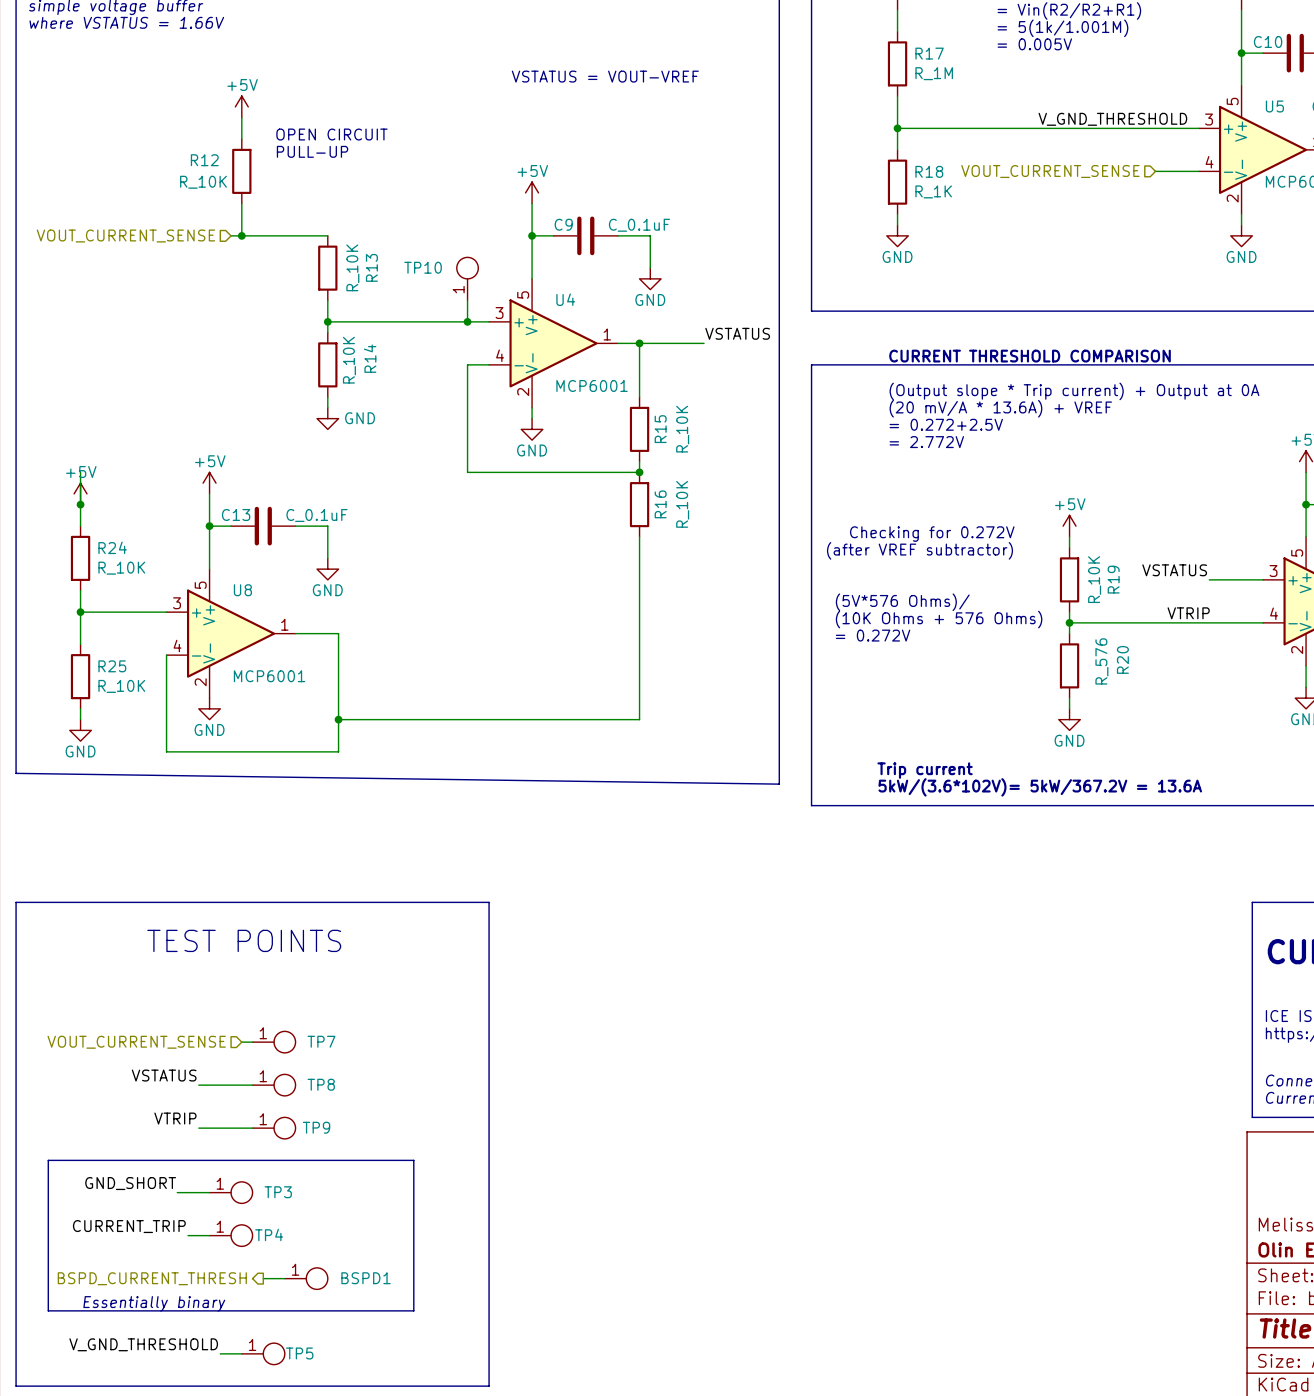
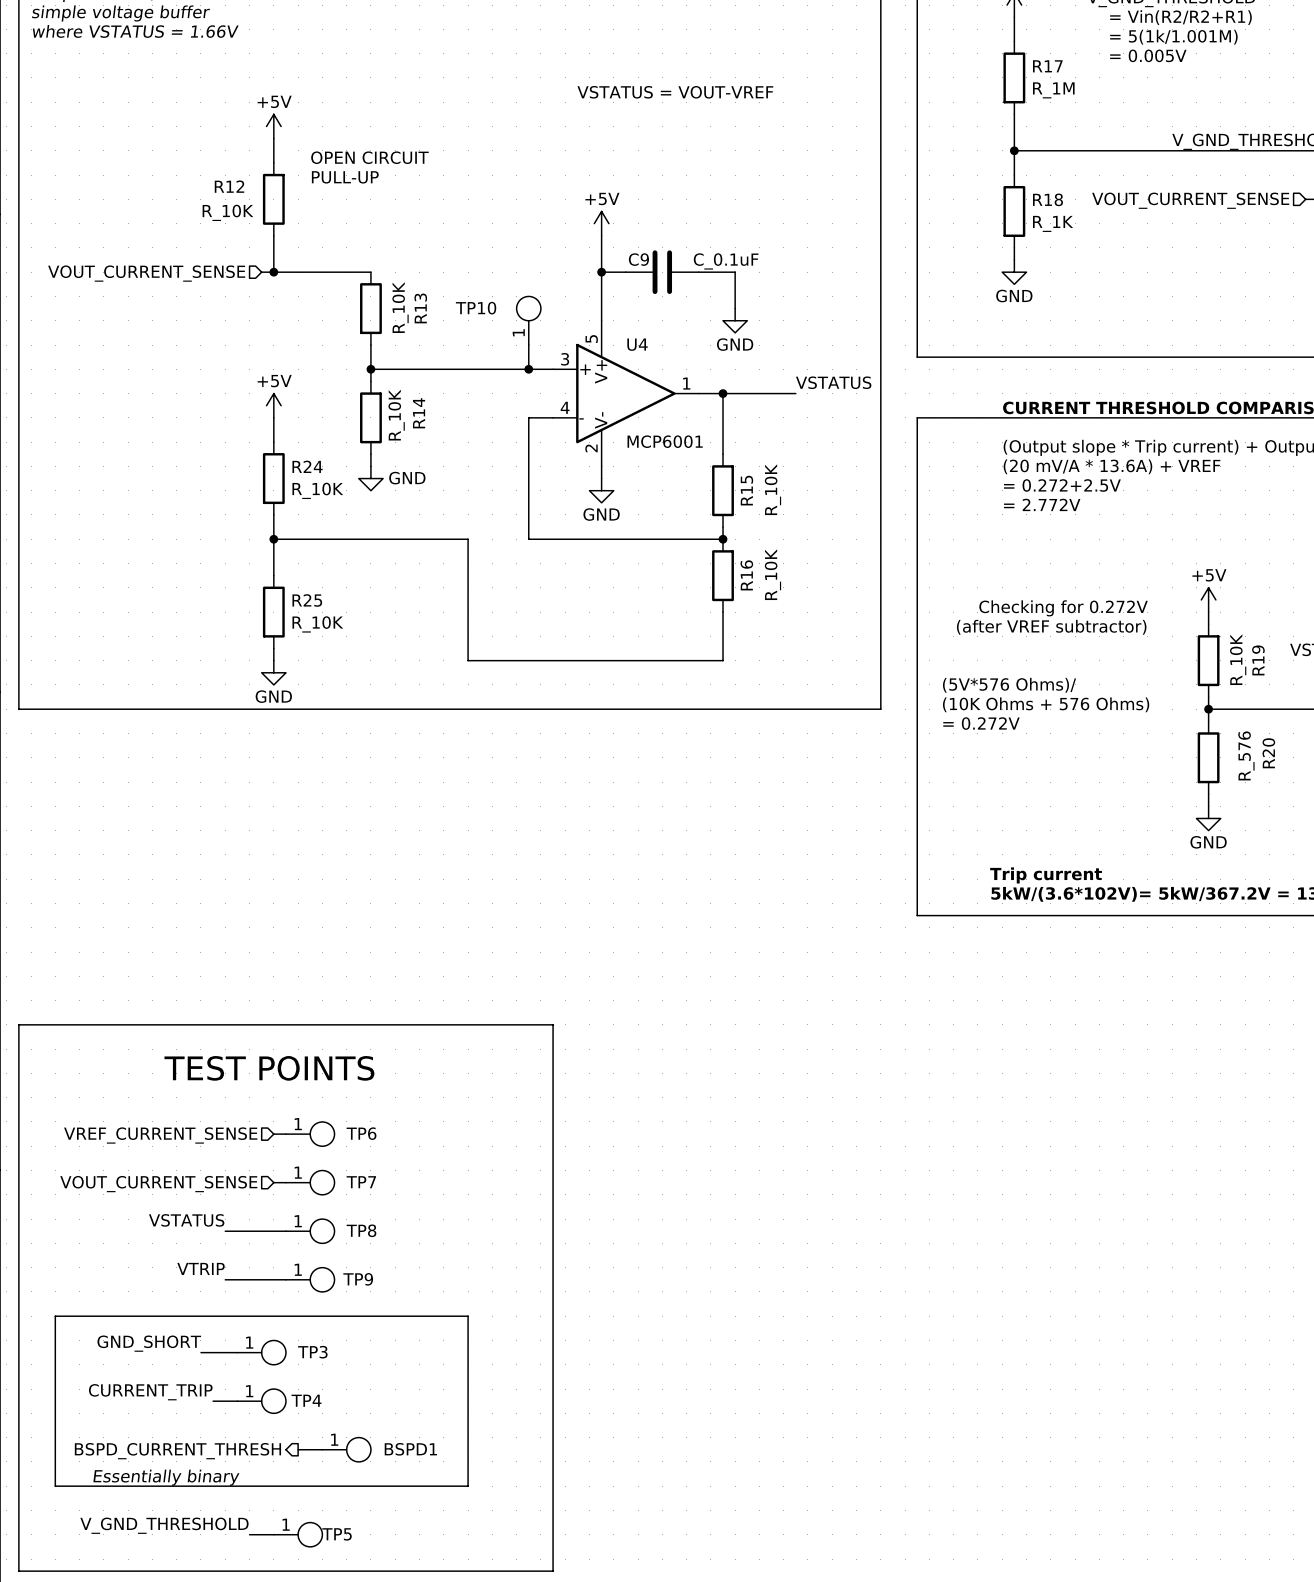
power symbol: none -> +5V (273, 405)
wire: none -> (273, 417) (273, 442)
wire: (80, 472) (80, 526) -> (273, 514) (273, 575)
junction: none -> (273, 539)
power symbol: +5V (209, 483) -> none
power symbol: +5V (80, 493) -> none
wire: (209, 493) (209, 569) -> none
junction: (80, 504) -> none
wire: (209, 526) (231, 526) -> none
junction: (209, 526) -> none
C13: C_0.1uF (263, 526) -> none
wire: (295, 526) (327, 526) (327, 558) -> none
R24 position: (80, 558) -> (273, 478)
wire: none -> (273, 648) (273, 660)
power symbol: GND (327, 569) -> none
wire: (639, 579) (639, 719) (338, 719) -> (723, 660) (468, 660) (468, 539) (273, 539)
wire: (80, 590) (80, 644) -> none
power symbol: none -> GND (273, 672)
wire: (80, 612) (166, 612) -> none
junction: (80, 612) -> none
line: (16, 622) (16, 773) (779, 784) (779, 622) -> (18, 709) (880, 709)
U8: MCP6001 (231, 633) -> none
wire: (295, 633) (338, 633) (338, 751) (166, 751) (166, 655) -> none
R25 position: (80, 676) -> (273, 612)
wire: (80, 708) (80, 719) -> none
power symbol: GND (209, 708) -> none
junction: (338, 719) -> none
power symbol: GND (80, 730) -> none
hierarchical label: none -> VREF_CURRENT_SENSE (160, 1135)
wire: none -> (273, 1134) (285, 1134)
TP6: none -> (310, 1134)

